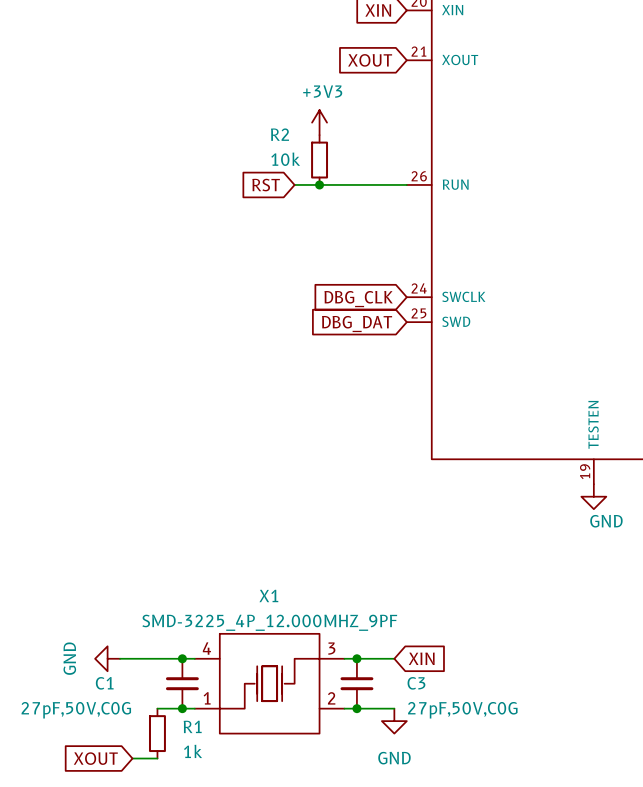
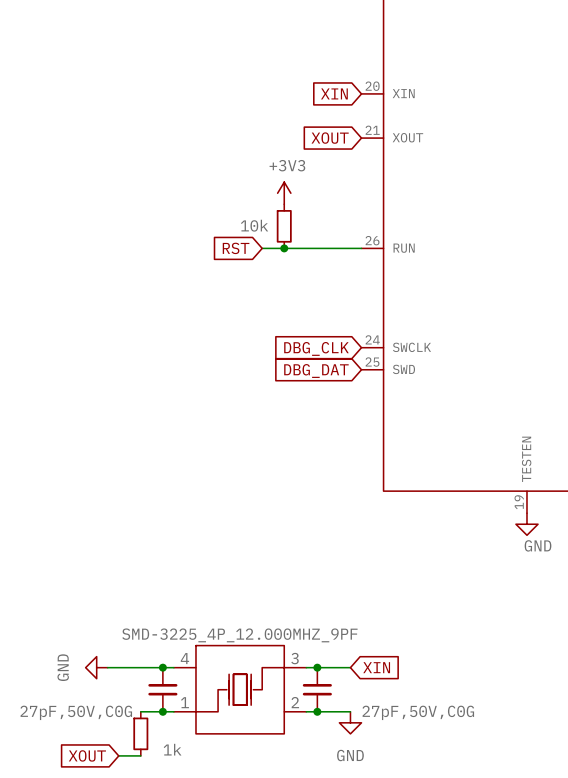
R2 name: R2 (279, 134) -> none
X1 name: X1 (268, 595) -> none
C1 name: C1 (104, 683) -> none
C3 name: C3 (416, 683) -> none
R1 name: R1 (192, 726) -> none

